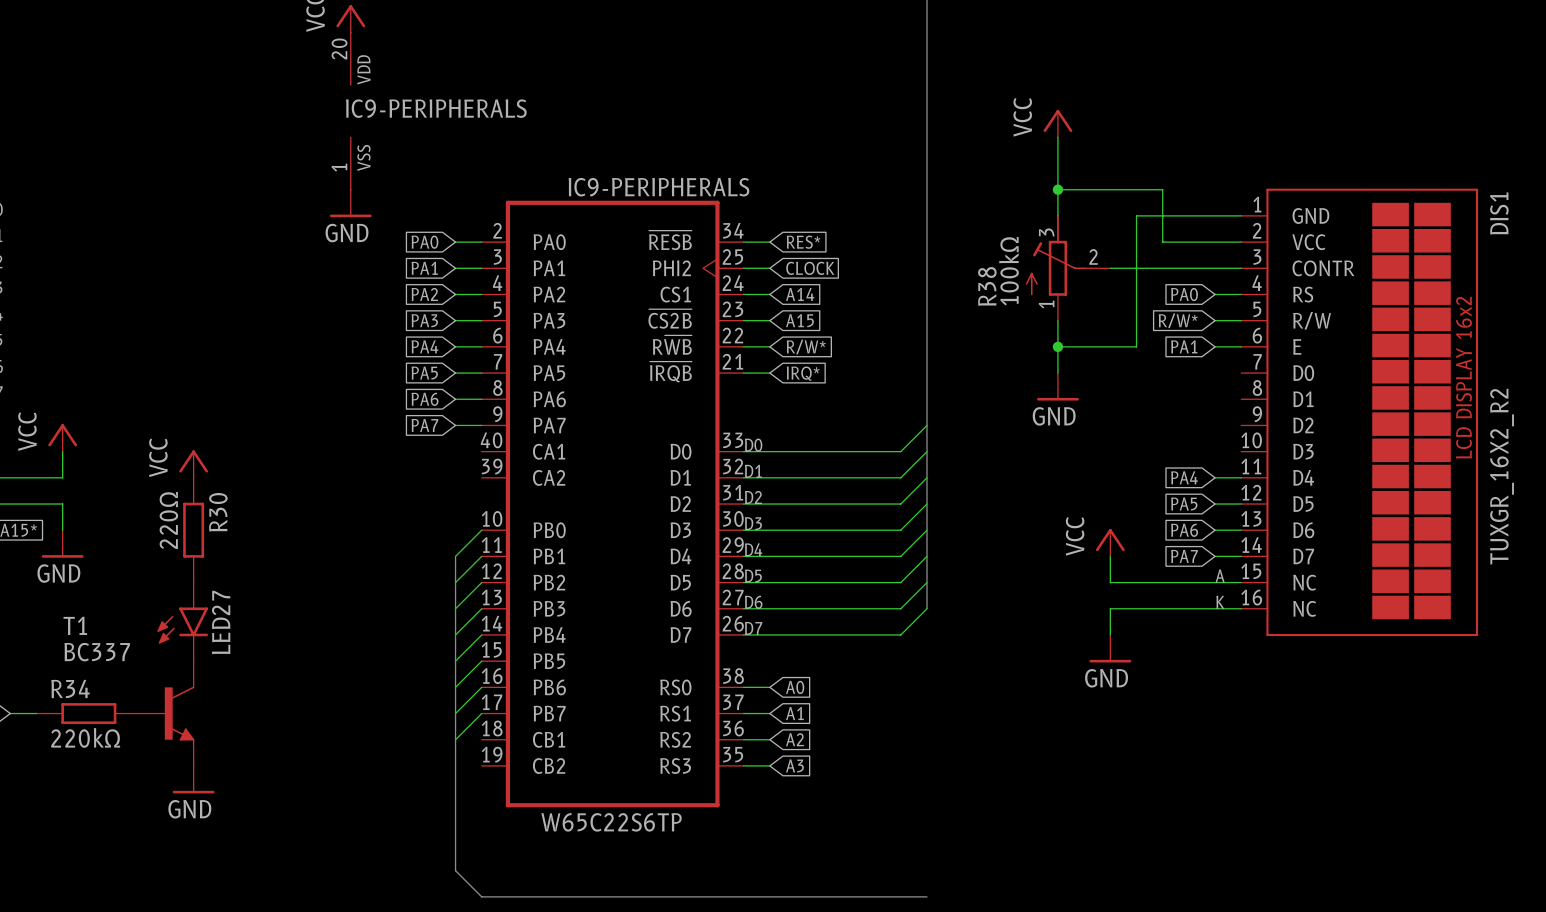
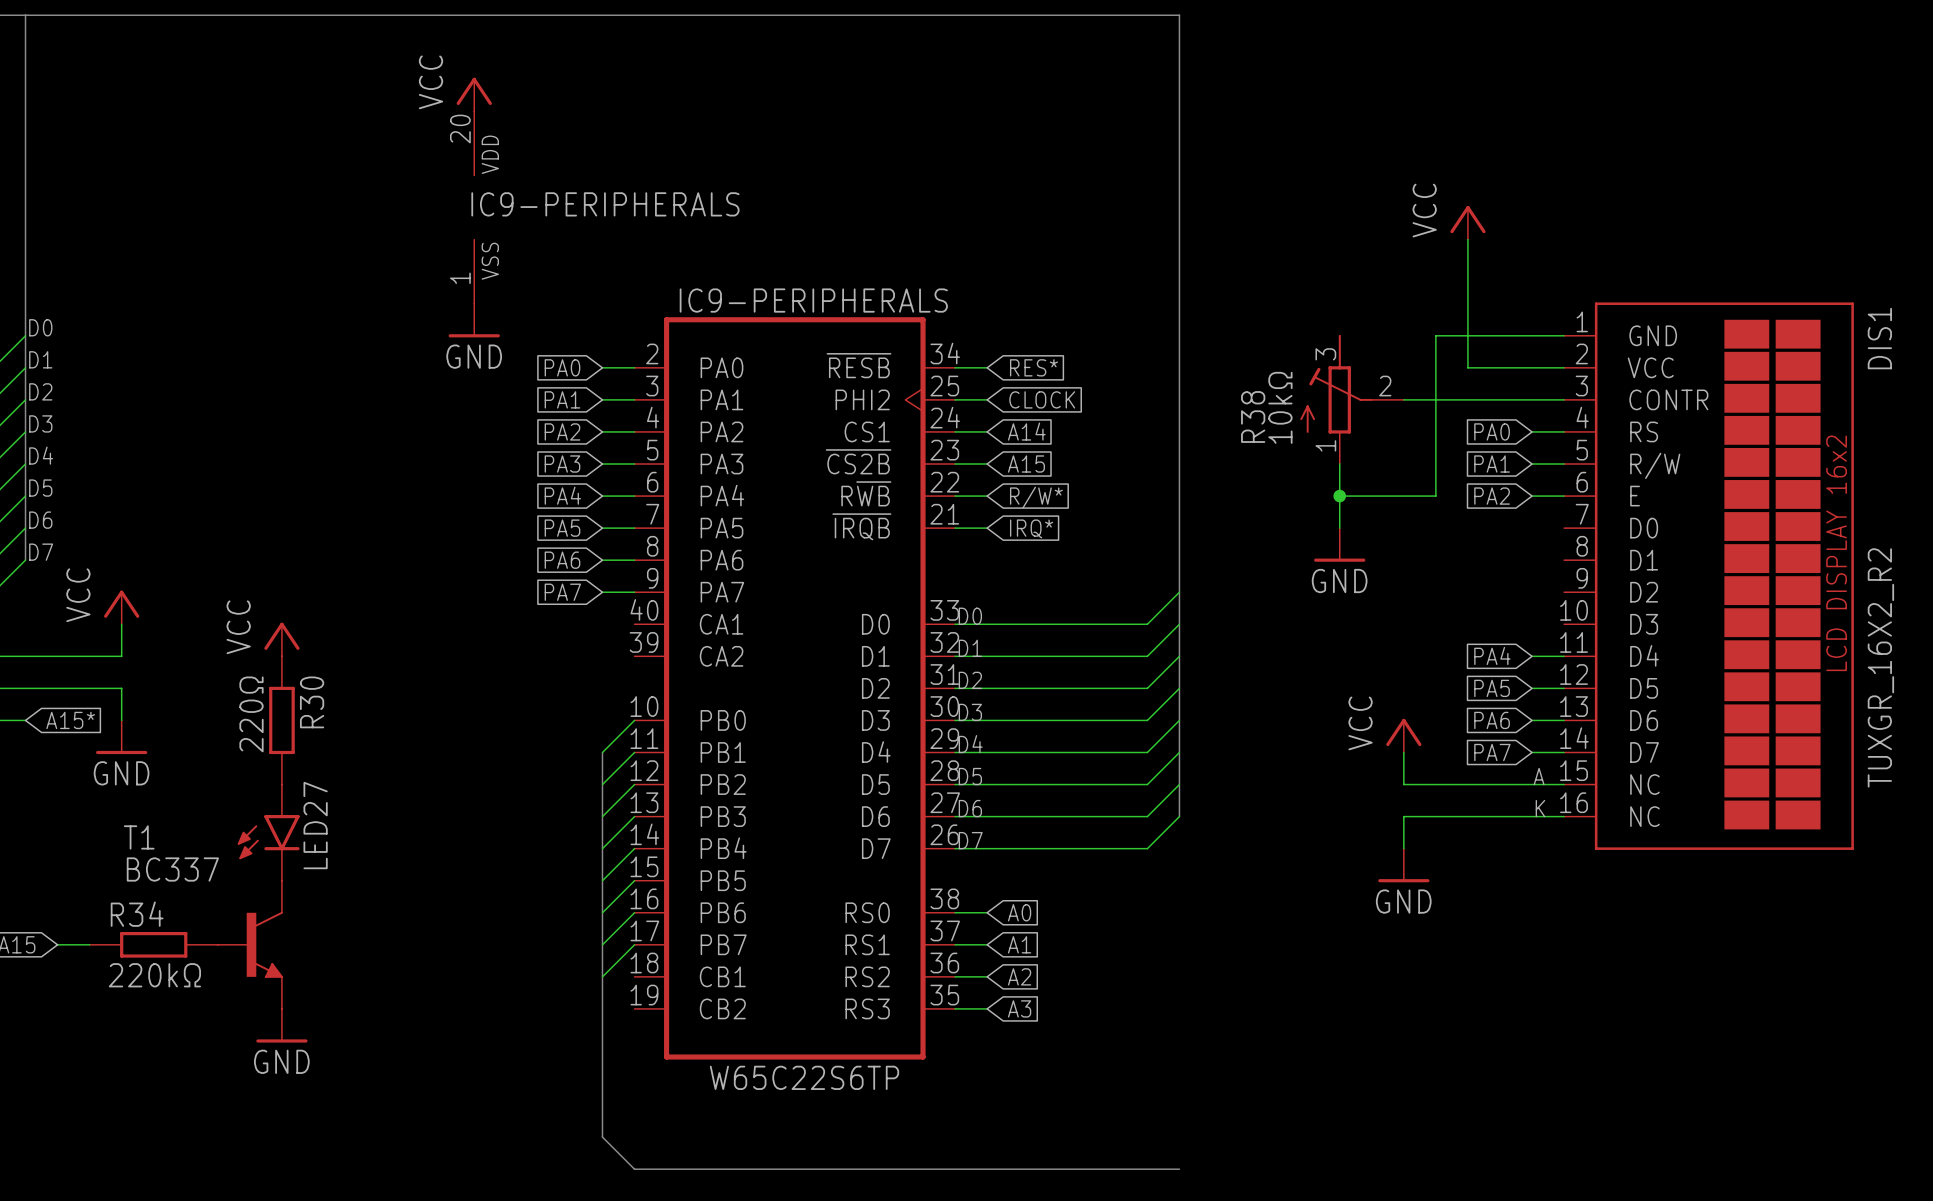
power symbol position: VCC (1057, 123) -> VCC (1467, 222)
wire: (1057, 137) (1057, 215) -> none
IC9-PERIPHERALS name position: IC9-PERIPHERALS (658, 187) -> IC9-PERIPHERALS (813, 300)
wire: (1057, 189) (1162, 189) -> (1467, 239) (1467, 303)
junction: (1057, 189) -> none
R38 value: 100kΩ (1008, 271) -> 10kΩ (1280, 407)
global label: R/W* (1178, 320) -> PA1 (1492, 464)
global label: PA1 (1184, 346) -> PA2 (1492, 496)

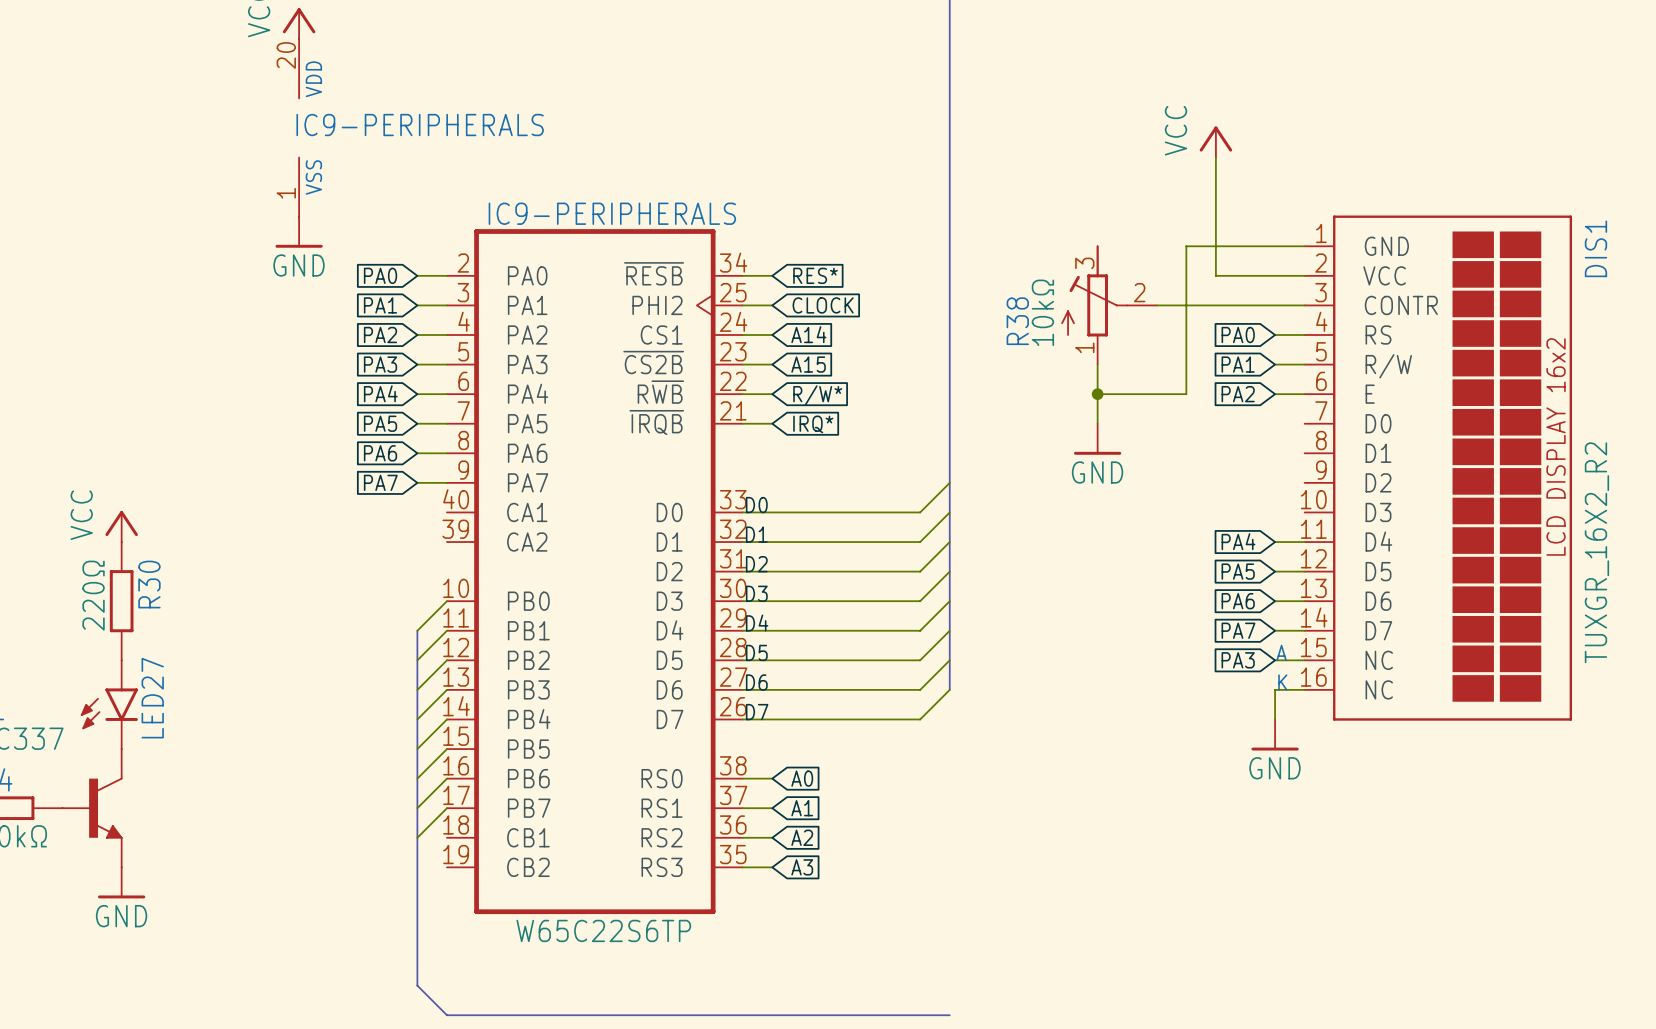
power symbol: VCC (1403, 735) -> none
wire: (1403, 752) (1403, 784) (1532, 784) -> none
global label: none -> PA3 (1238, 660)
wire: (1532, 816) (1403, 816) (1403, 848) -> (1275, 689) (1275, 719)
power symbol position: GND (1403, 865) -> GND (1275, 735)

